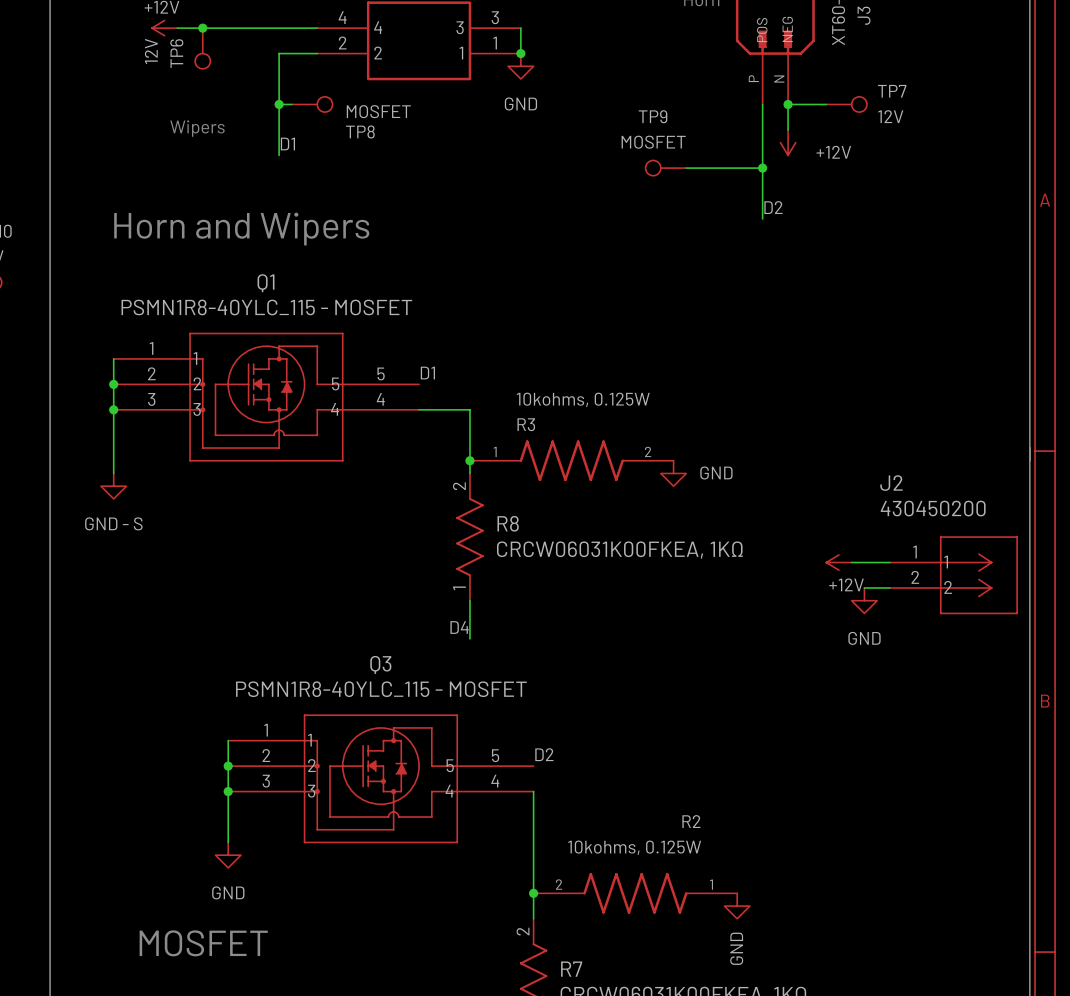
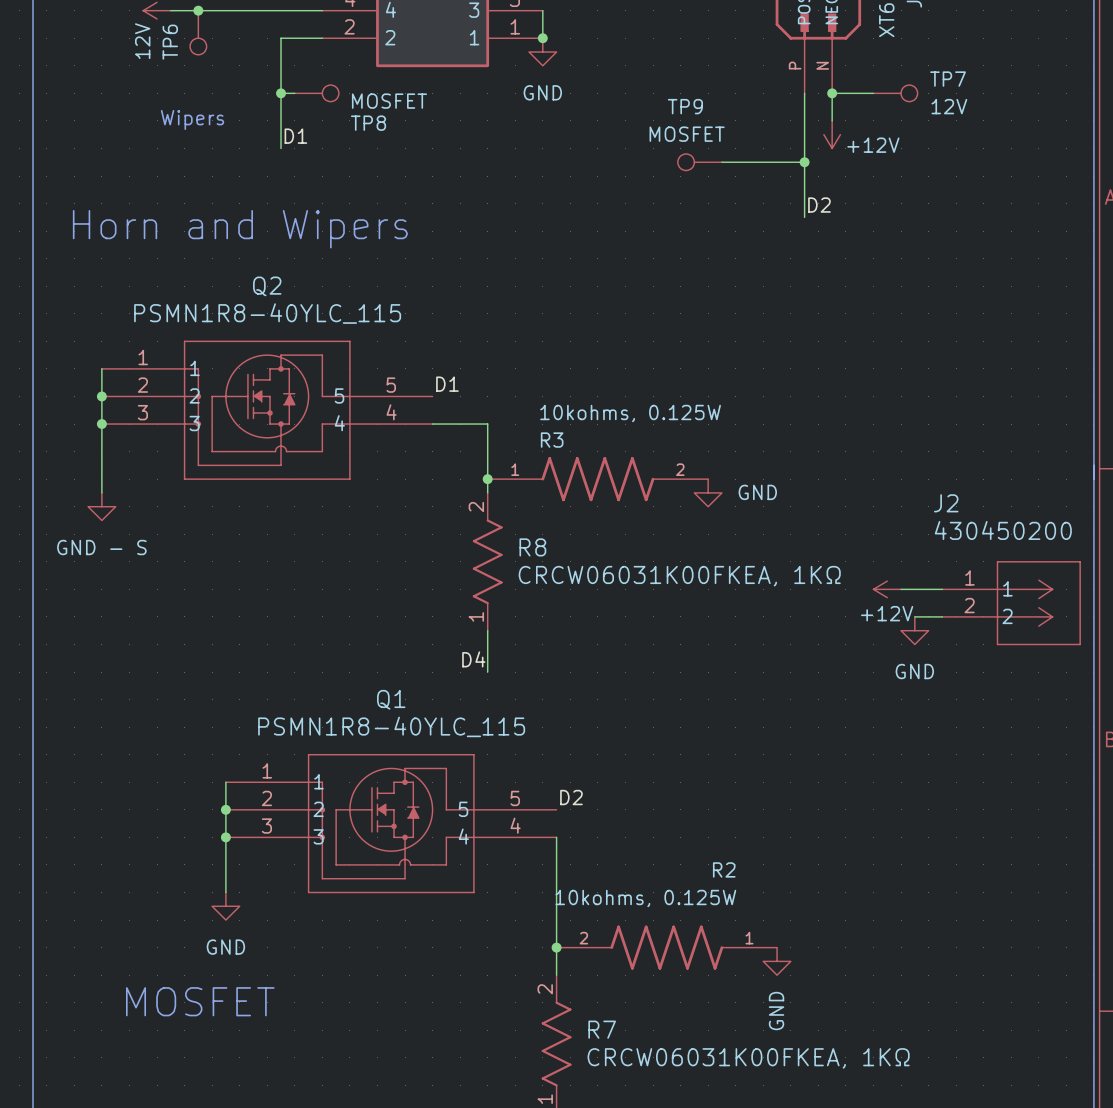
Q1 name: Q1 (266, 283) -> Q2 (267, 286)
Q1 value: PSMN1R8-40YLC_115 - MOSFET (266, 307) -> PSMN1R8-40YLC_115 (267, 313)
Q3 name: Q3 (380, 664) -> Q1 (391, 699)
Q3 value: PSMN1R8-40YLC_115 - MOSFET (381, 689) -> PSMN1R8-40YLC_115 (391, 726)

